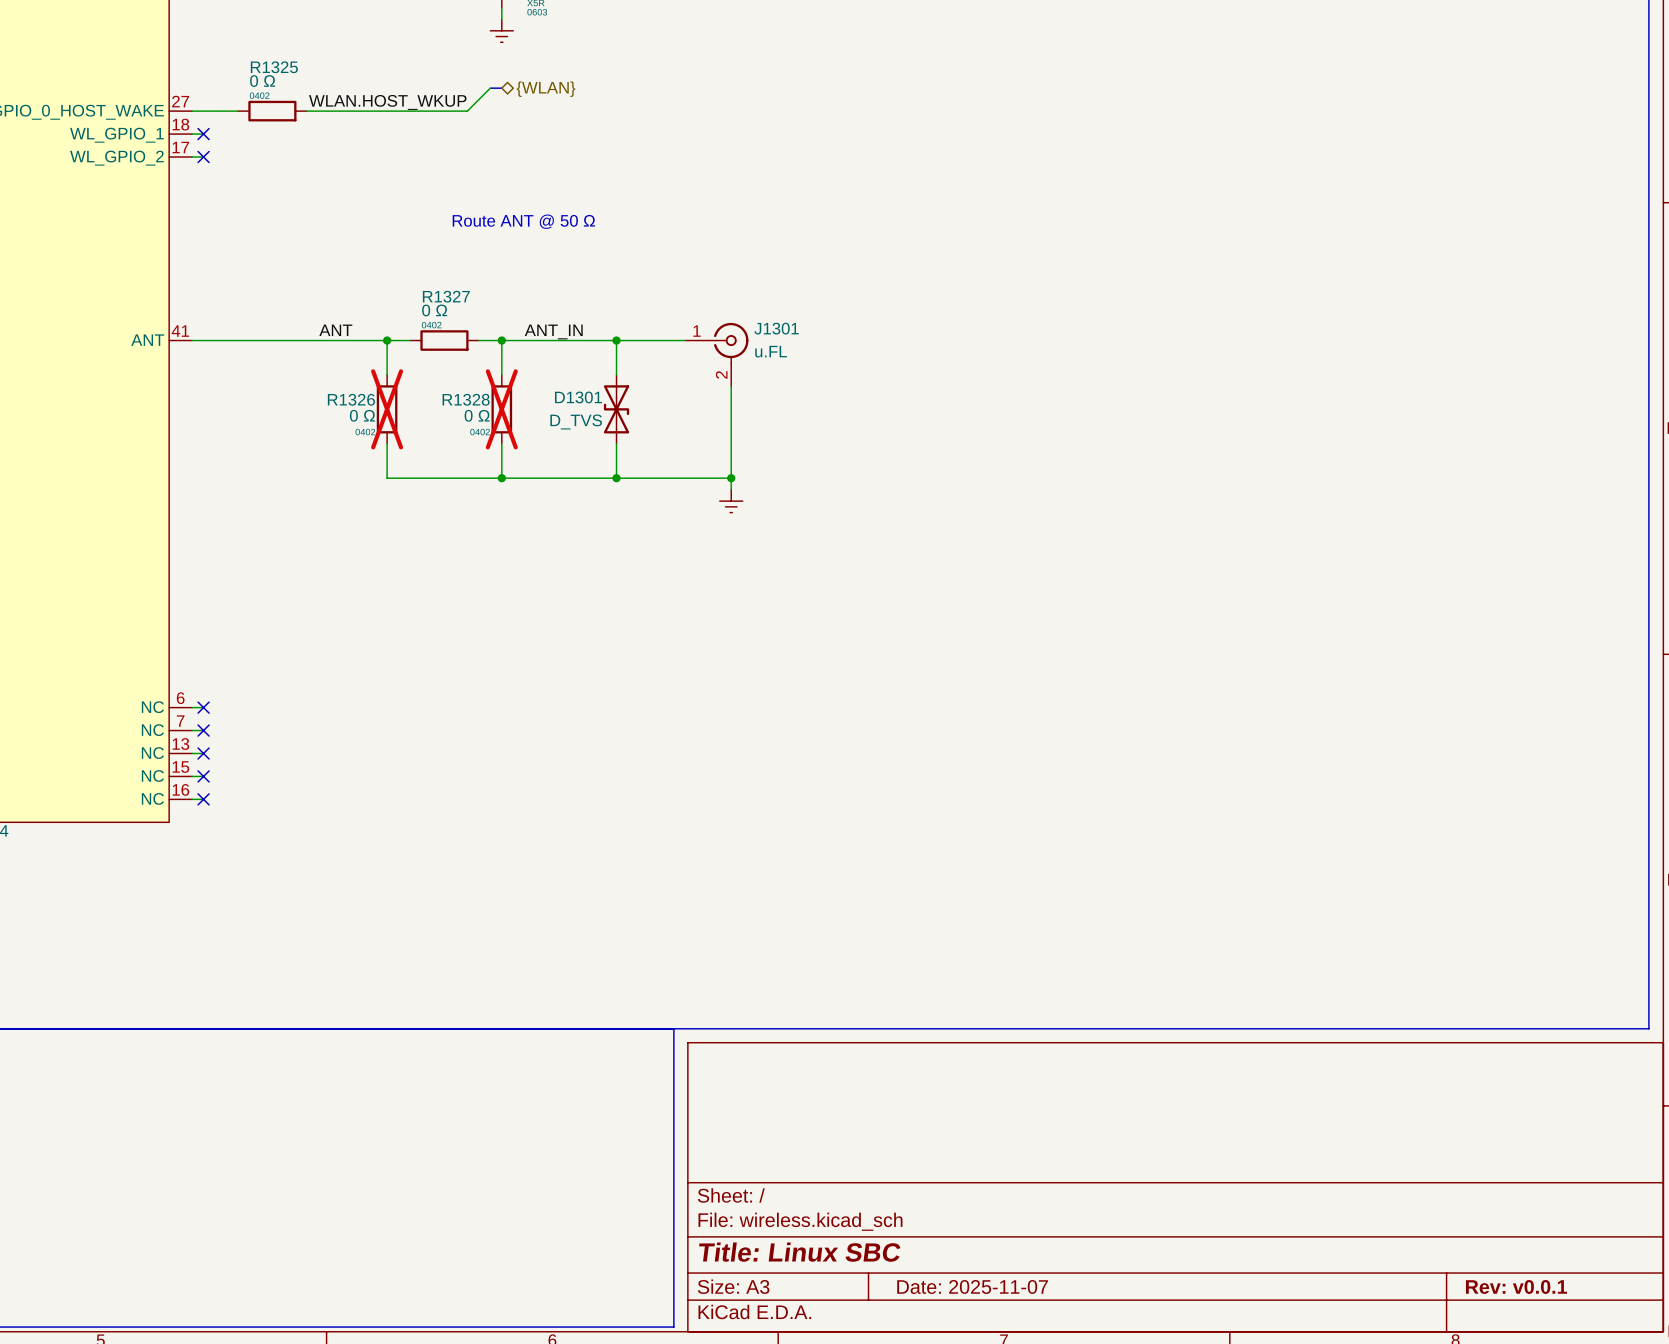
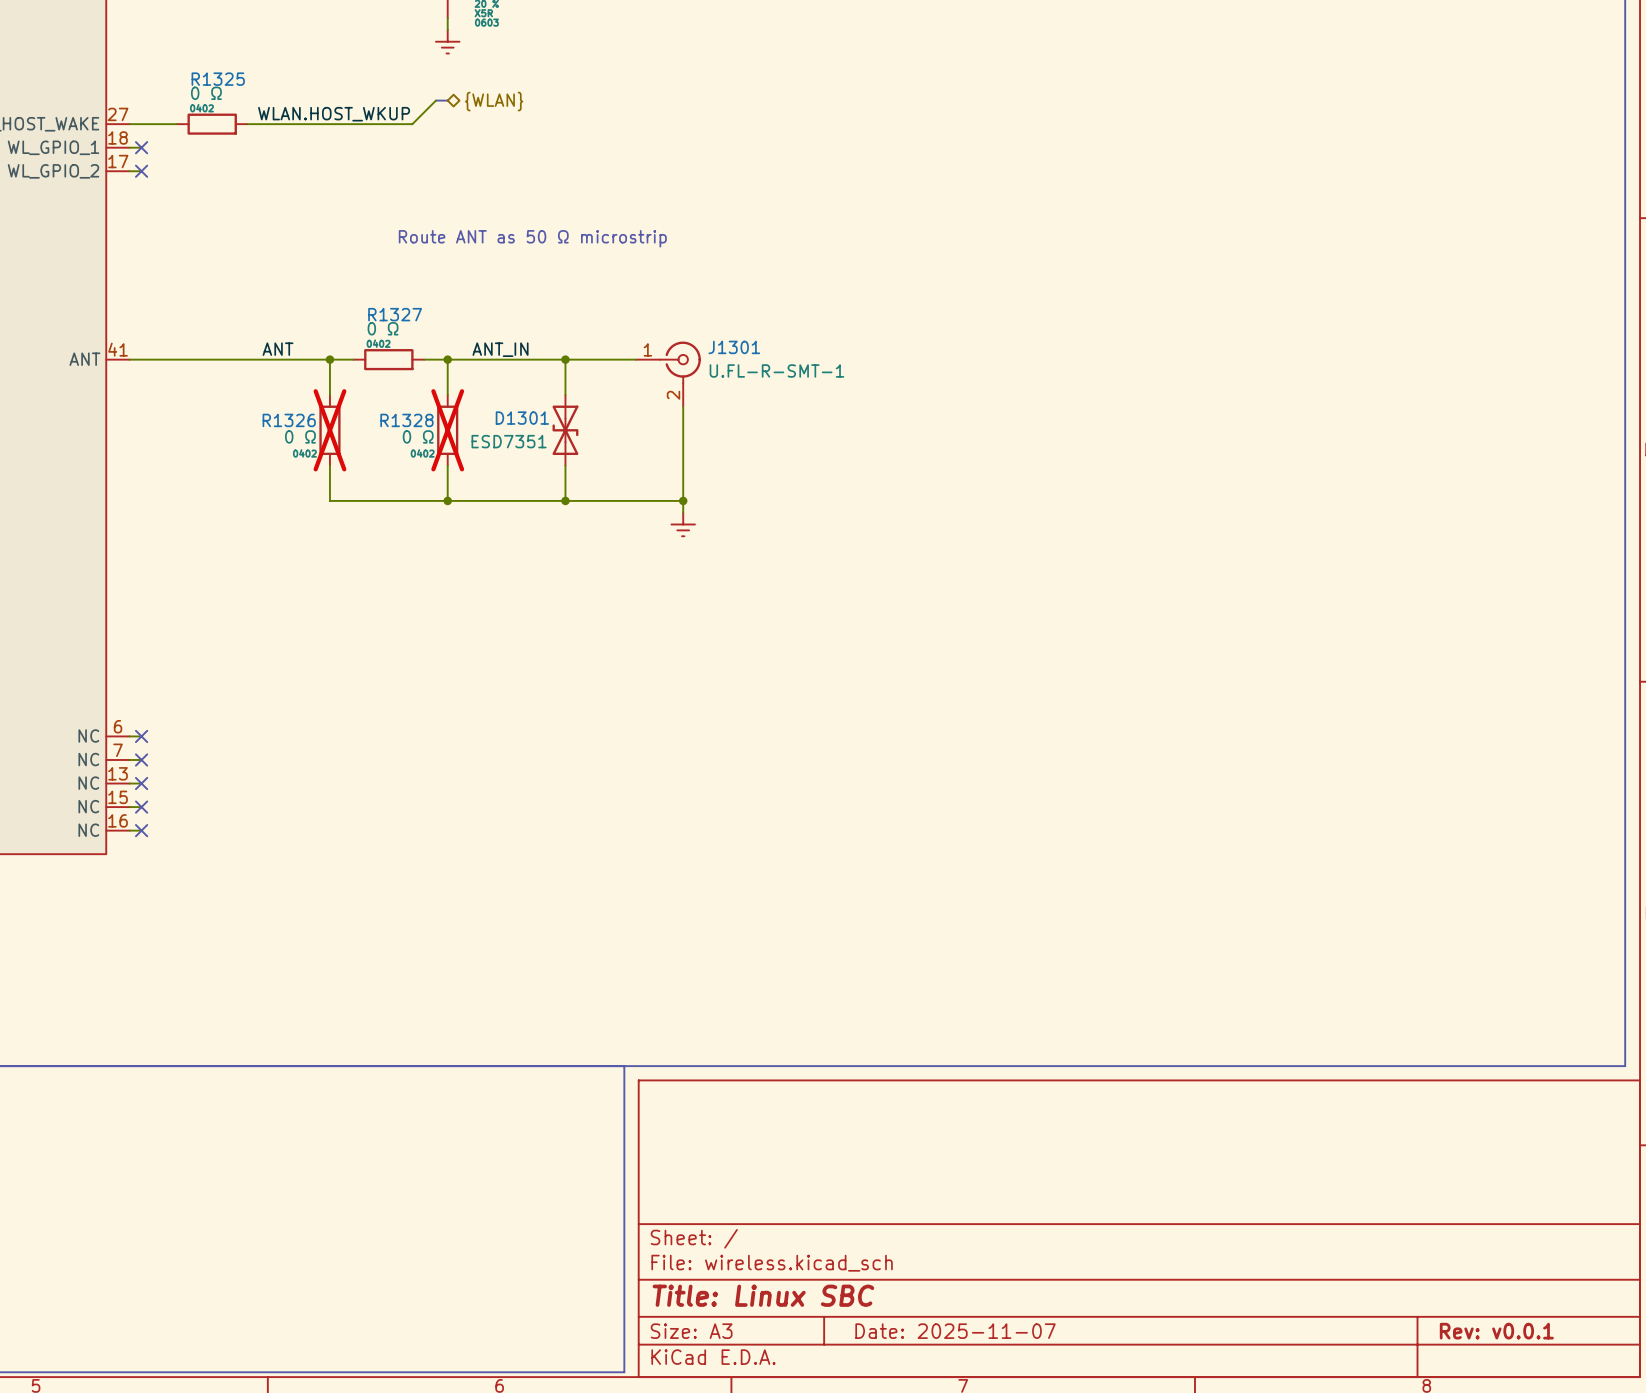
text: Route ANT @ 50 Ω (523, 221) -> Route ANT as 50 Ω microstrip (532, 238)
J1301 value: u.FL (771, 351) -> U.FL-R-SMT-1 (776, 370)
D1301 value: D_TVS (576, 421) -> ESD7351 (509, 441)

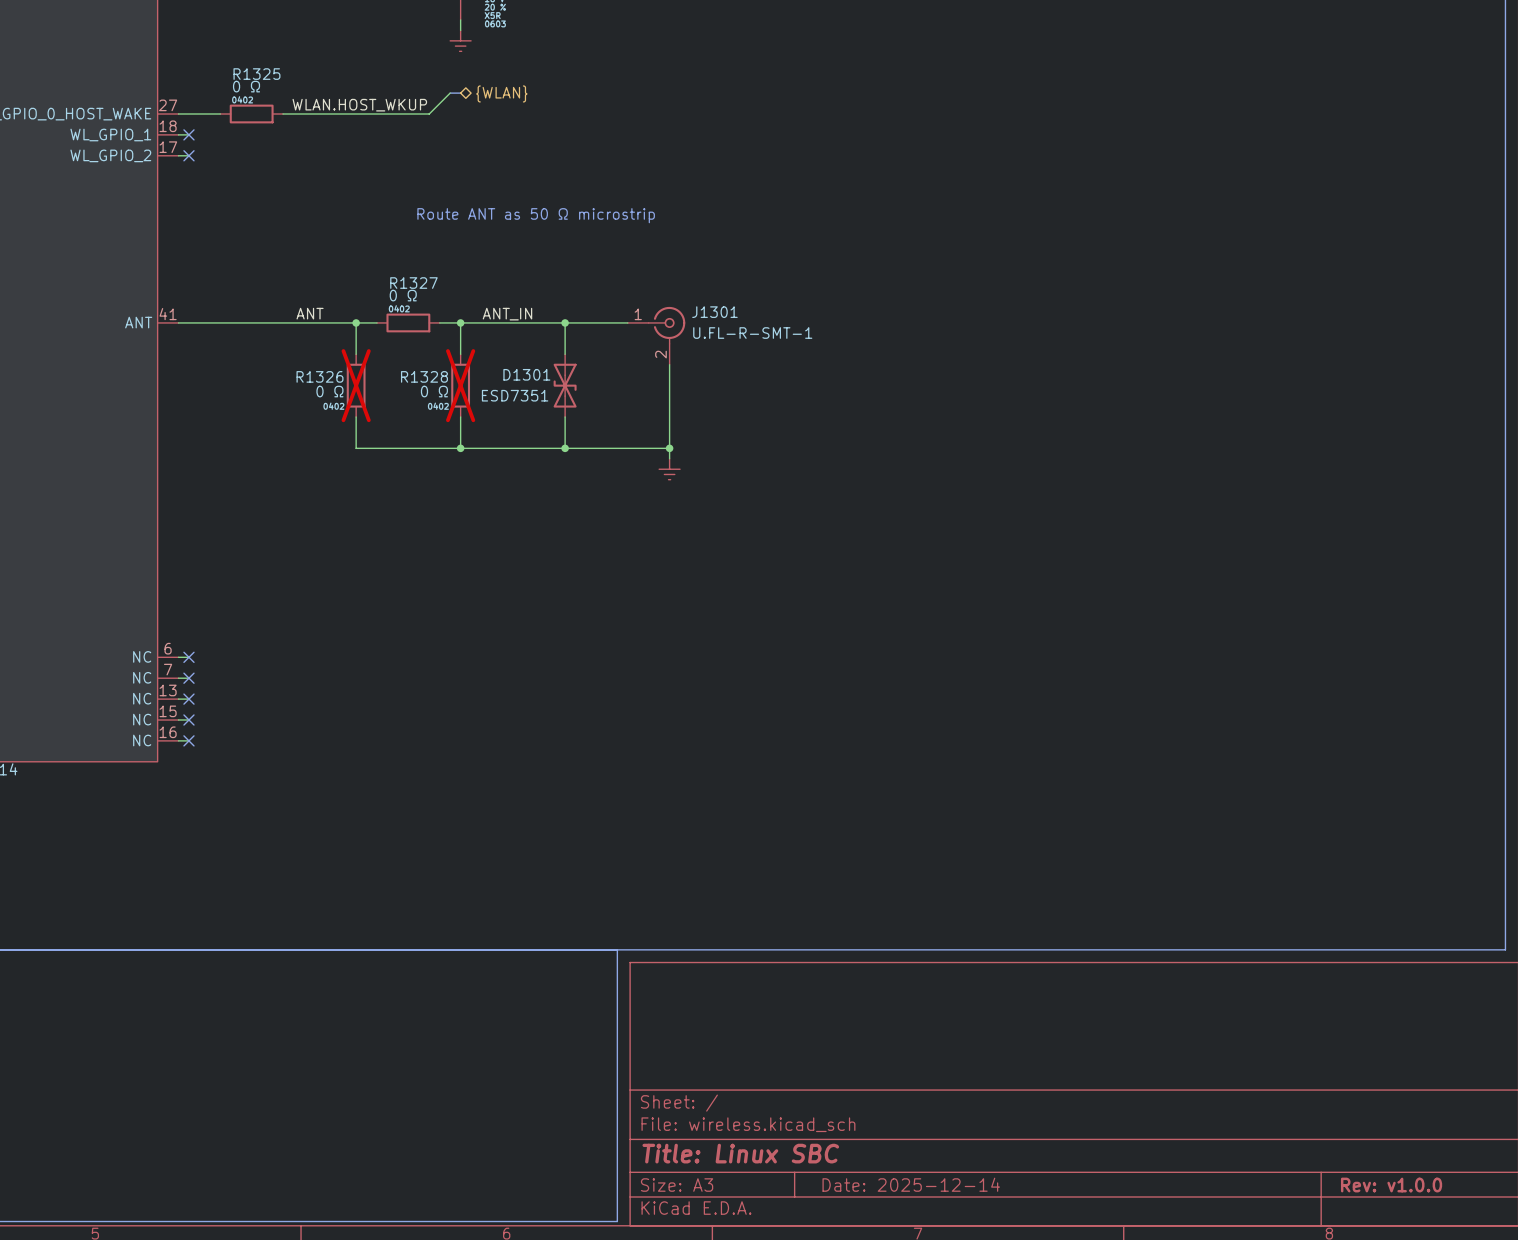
title block: Date: 2025-11-07 (955, 1331) -> Date: 2025-12-14 (911, 1184)
title block: Rev: v0.0.1 (1496, 1331) -> Rev: v1.0.0 (1391, 1185)

